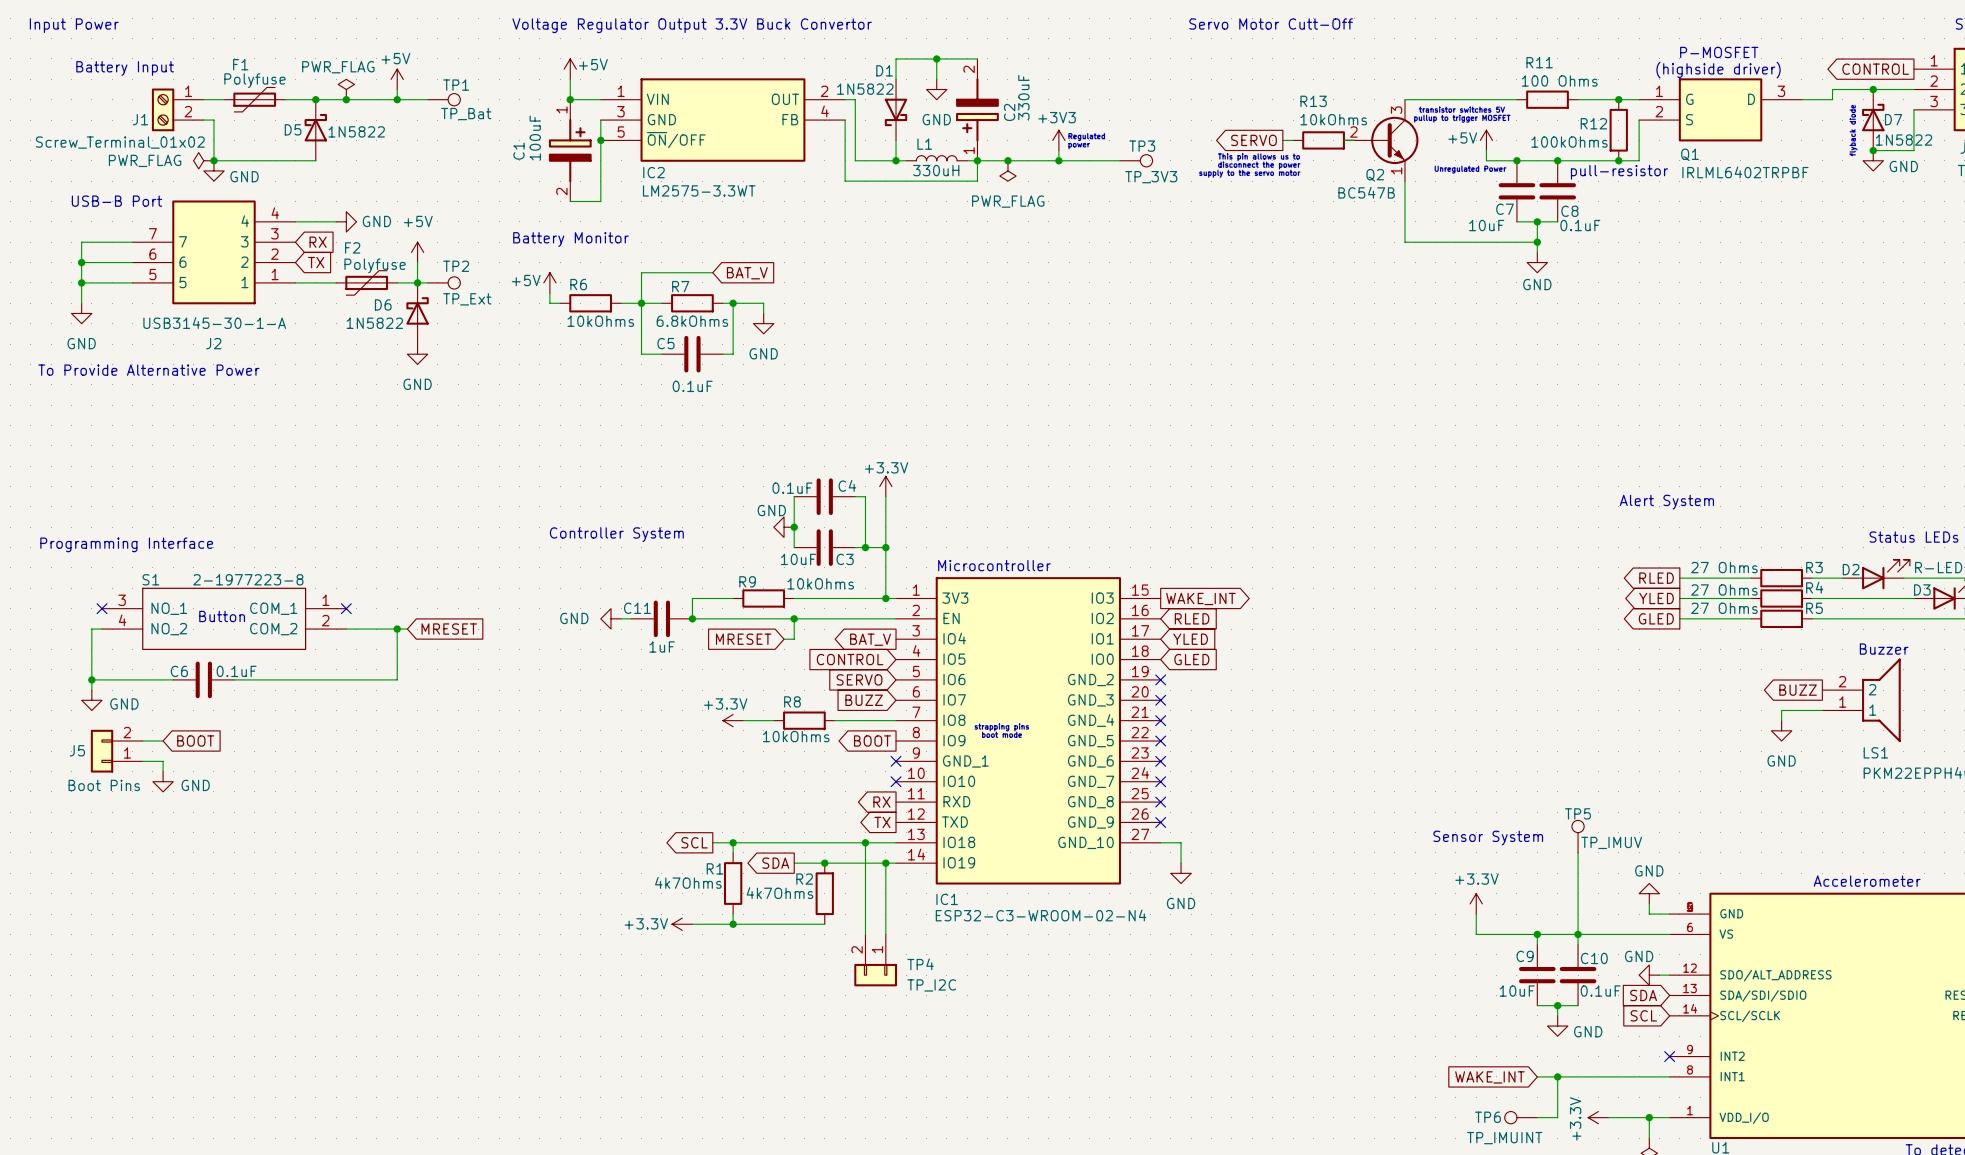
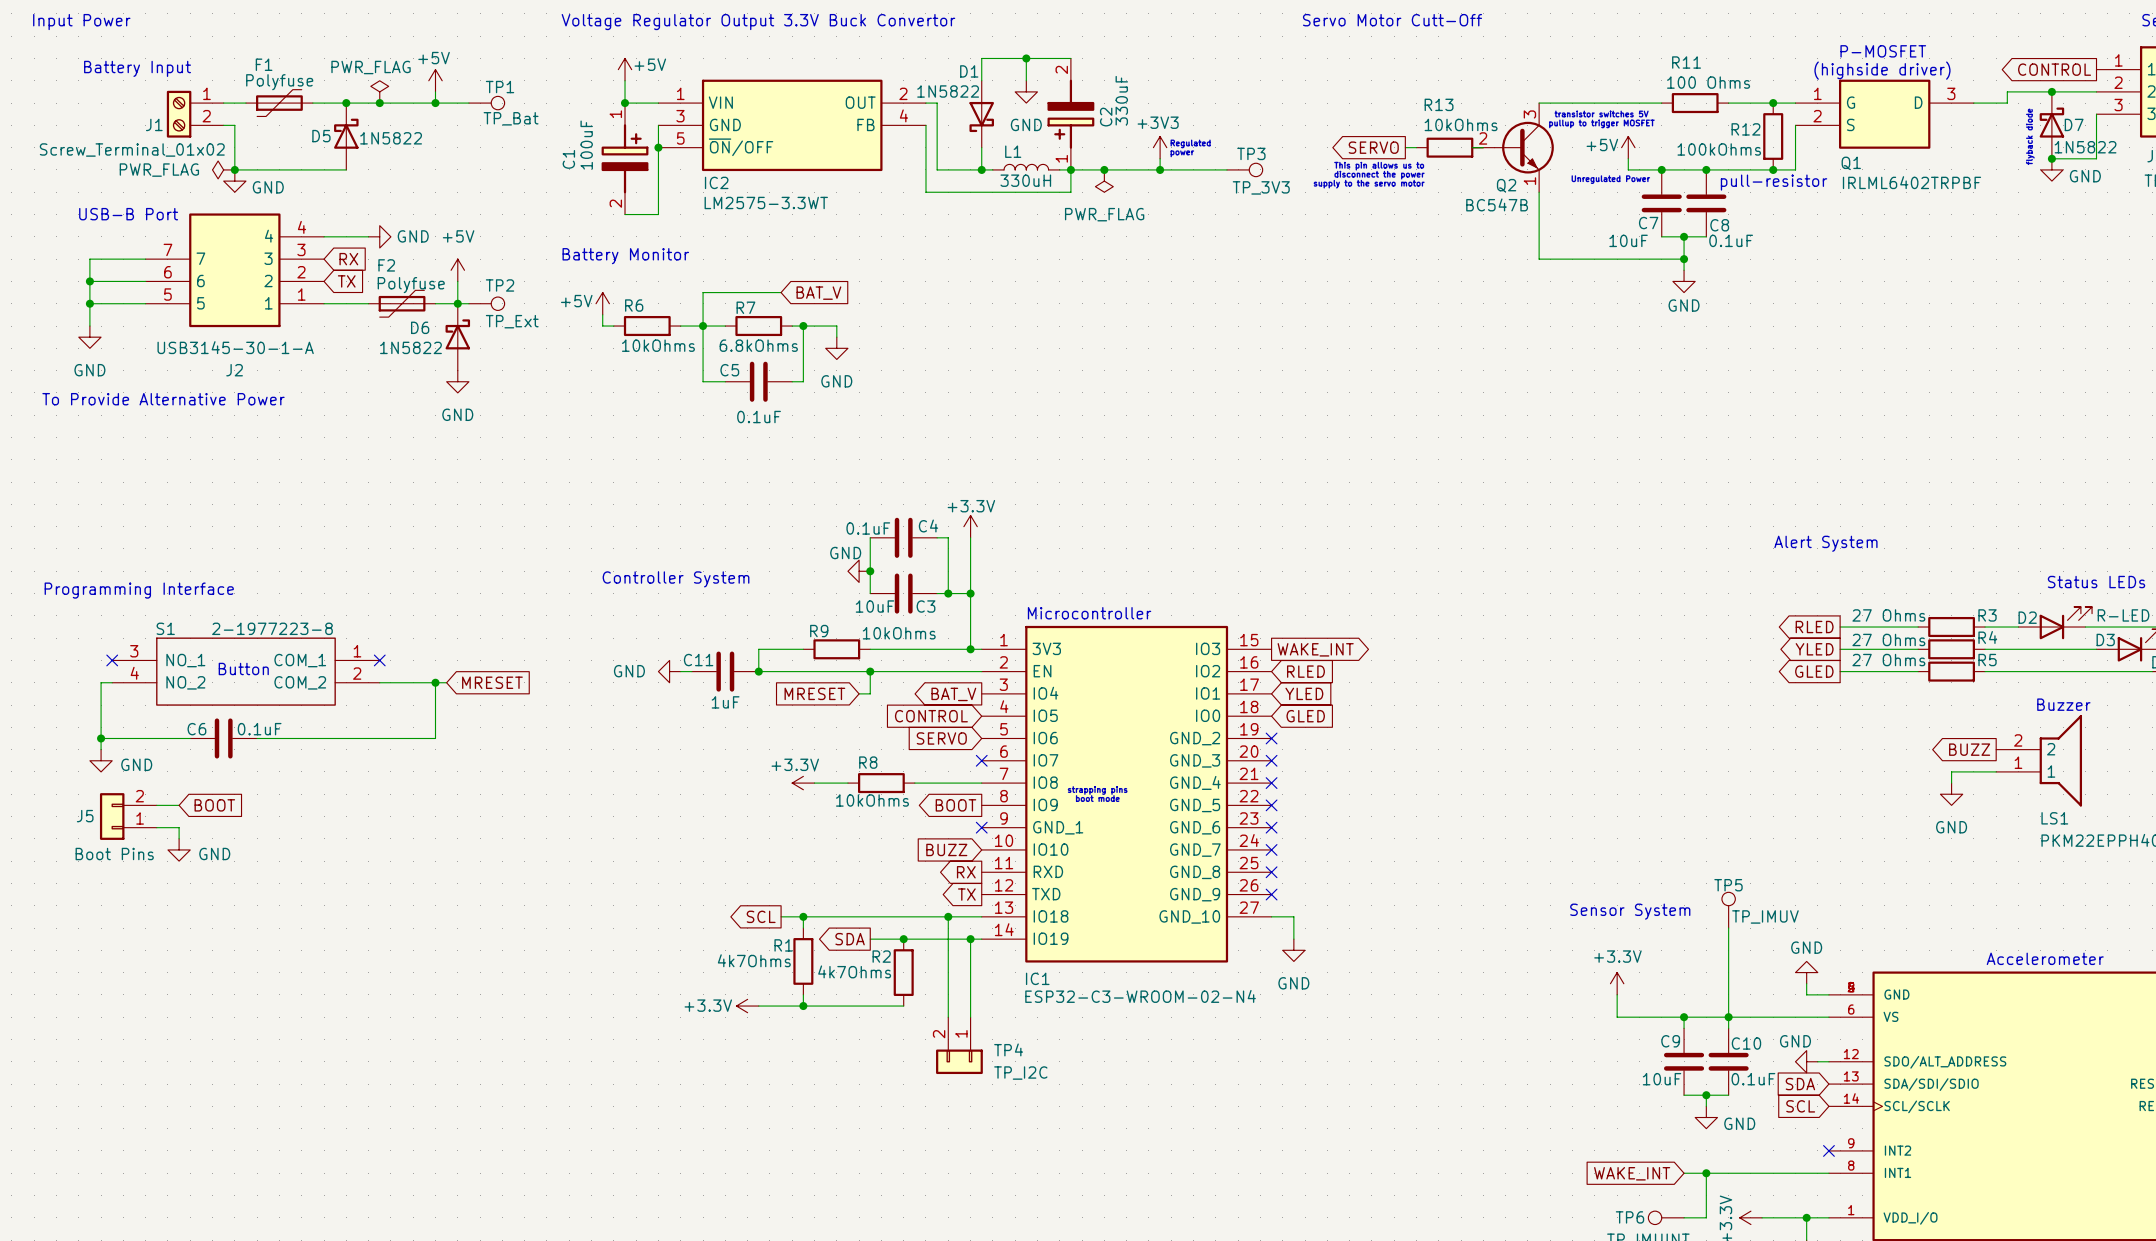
global label position: BUZZ (864, 700) -> BUZZ (946, 849)
no-connect mark: none -> (981, 760)
no-connect mark: (896, 781) -> none

